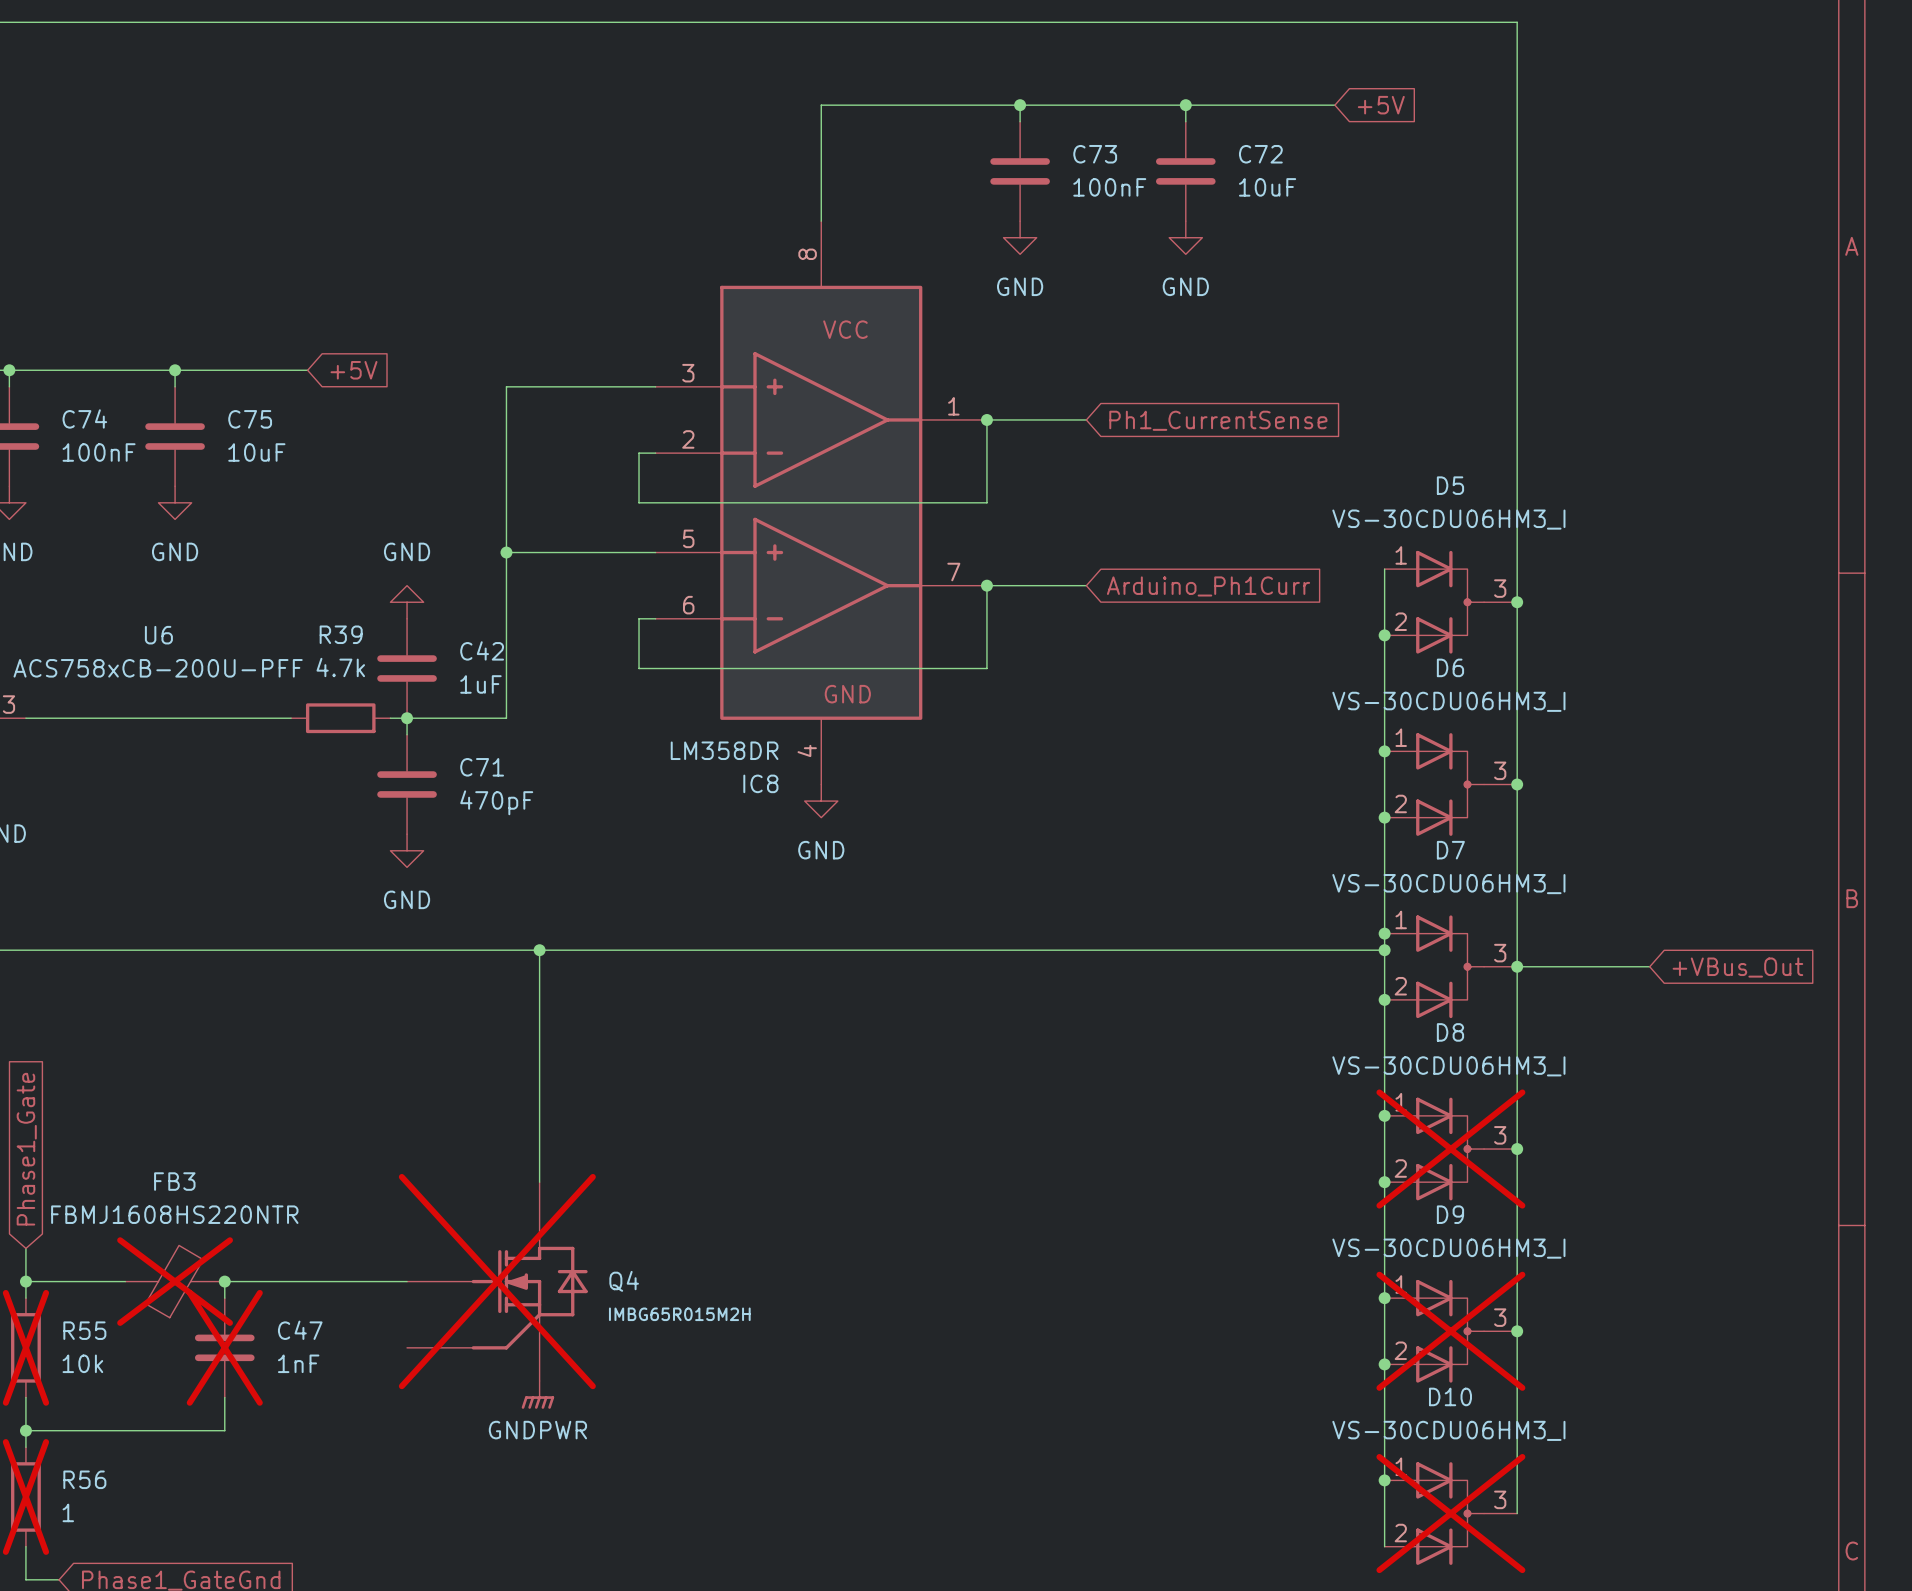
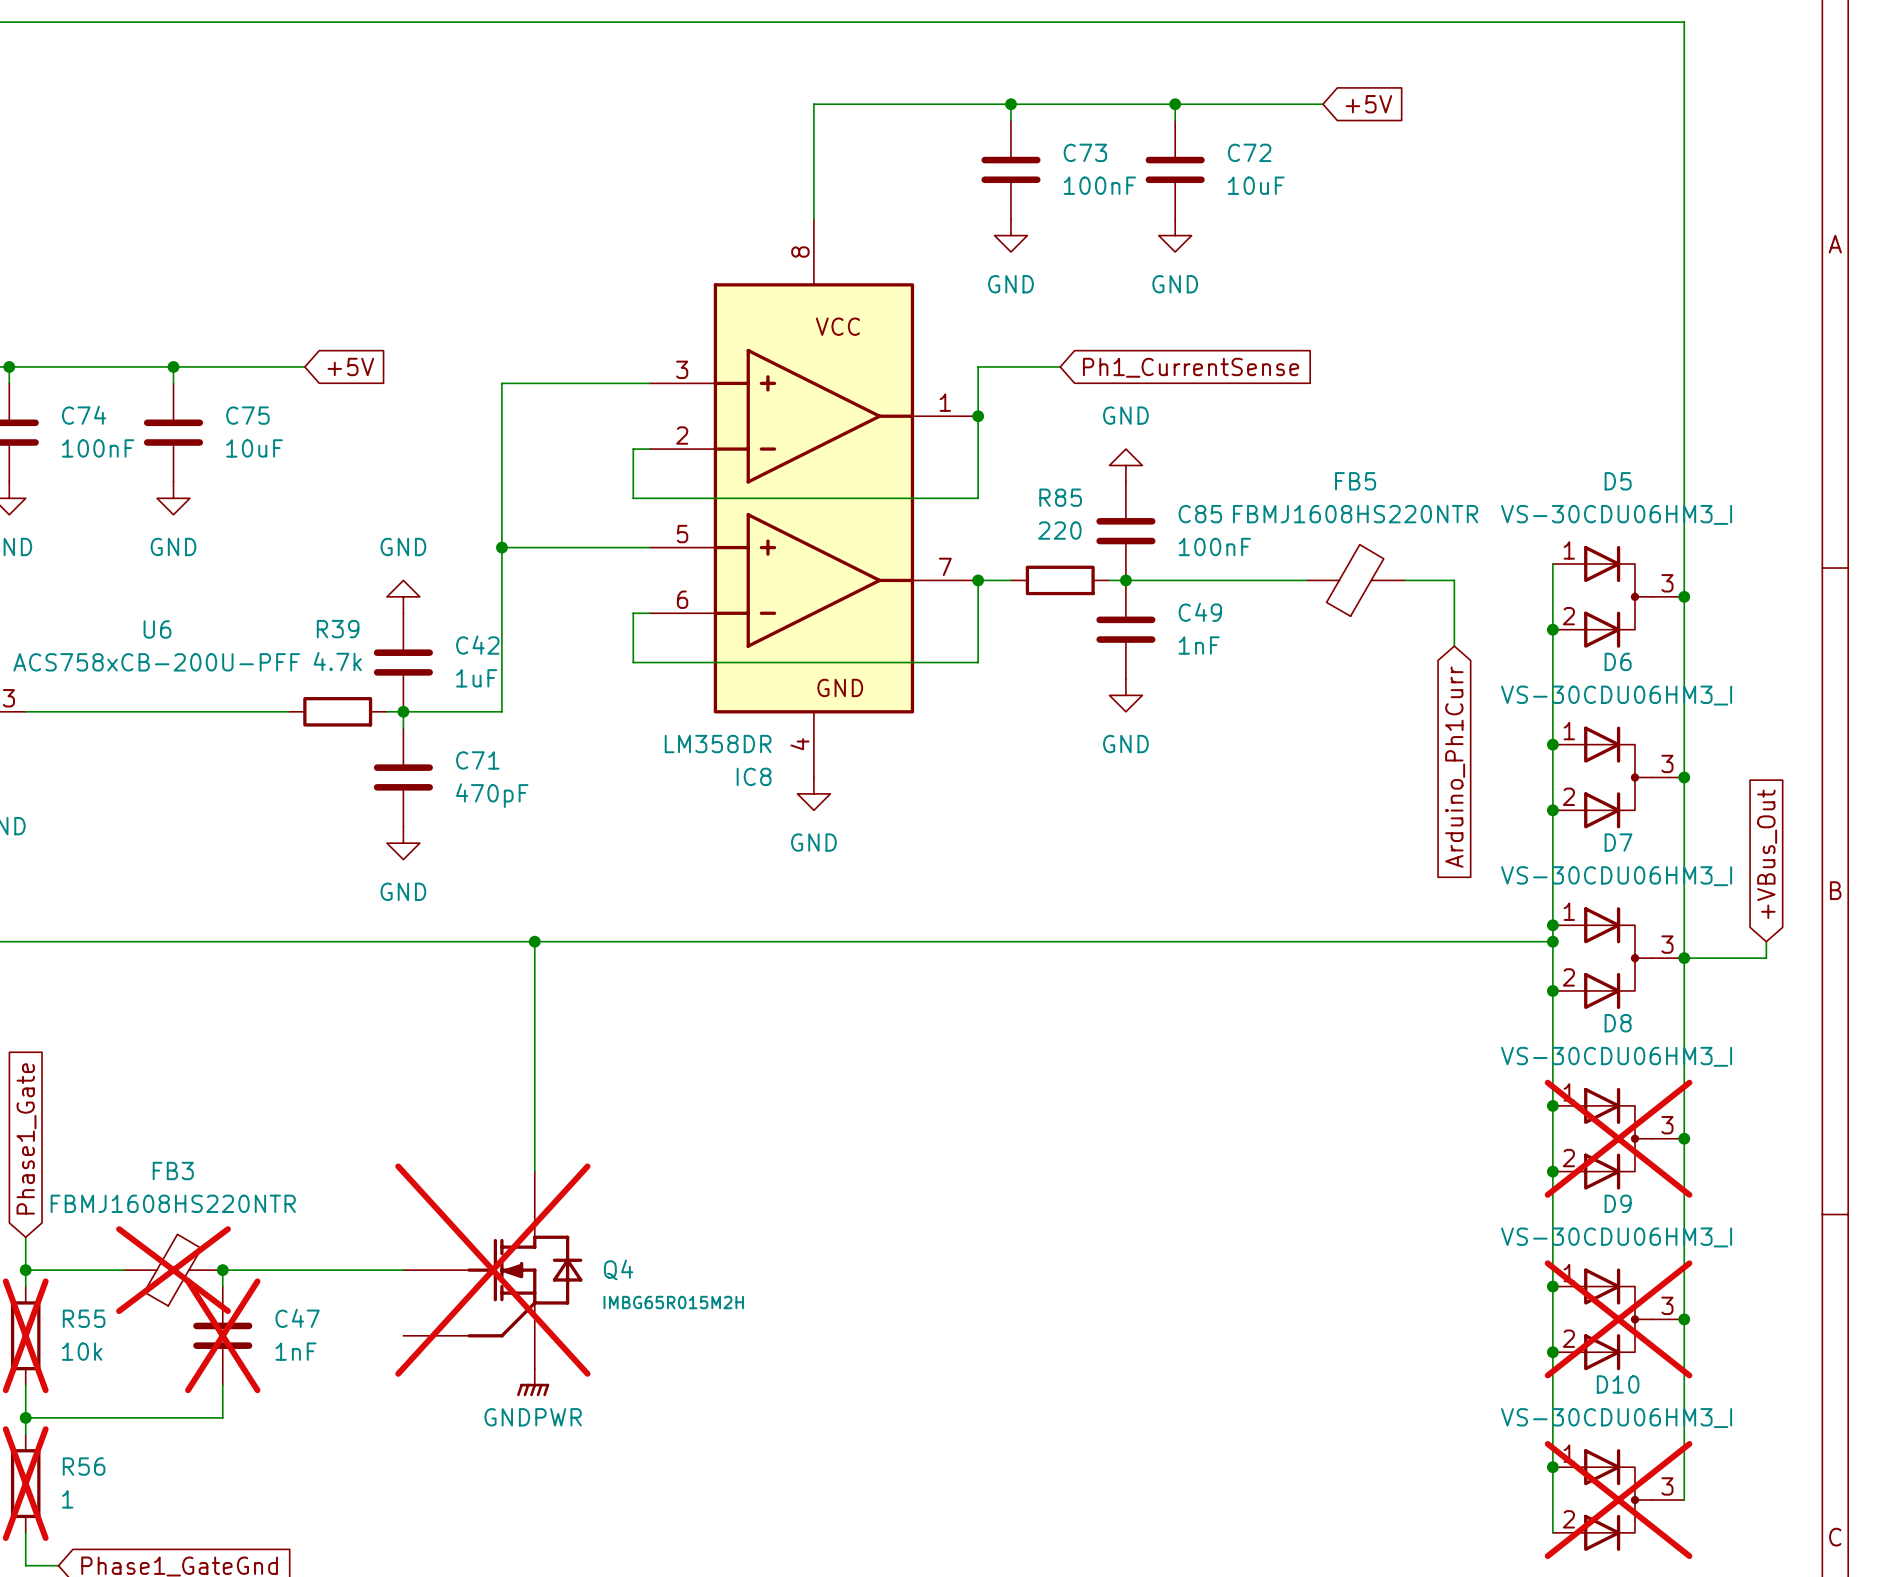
wire: (1517, 22) (1517, 1513) -> (1503, 22) (1684, 22) (1684, 1500)
wire: (986, 419) (1086, 419) -> (978, 416) (978, 366) (1060, 366)
global label position: Ph1_CurrentSense (1218, 420) -> Ph1_CurrentSense (1191, 367)
power symbol: none -> GND (1125, 465)
C85: none -> 100nF (1125, 531)
wire: (1384, 569) (1384, 1546) -> (1552, 564) (1552, 1532)
wire: (1020, 585) (1086, 585) -> none
R85: none -> 220 (1060, 580)
wire: none -> (1109, 580) (1306, 580)
junction: none -> (1125, 580)
FB5: none -> FBMJ1608HS220NTR (1355, 580)
wire: none -> (1405, 580) (1454, 580) (1454, 646)
global label: Arduino_Ph1Curr (1208, 586) -> none
D5 position: (1450, 602) -> (1618, 596)
junction position: (1517, 602) -> (1552, 629)
junction: none -> (1684, 596)
C49: none -> 1nF (1125, 629)
junction: (1384, 635) -> none
power symbol: none -> GND (1125, 695)
junction: (1384, 751) -> none
junction: none -> (1552, 744)
global label: none -> Arduino_Ph1Curr (1455, 767)
D6 position: (1450, 784) -> (1618, 777)
junction: (1517, 784) -> none
junction: none -> (1684, 777)
junction: (1384, 817) -> none
junction: none -> (1552, 810)
junction: (1384, 933) -> none
junction: none -> (1552, 925)
wire: none -> (1372, 941) (1552, 941)
junction: (1384, 950) -> none
junction: none -> (1552, 941)
wire: none -> (1766, 941) (1766, 958) (1684, 958)
D7 position: (1450, 966) -> (1618, 958)
wire: (1517, 966) (1649, 966) -> none
junction: (1517, 966) -> none
junction: none -> (1684, 958)
global label rotation: 0° (1737, 967) -> 90° counterclockwise (1767, 854)
junction: (1384, 999) -> none
junction: none -> (1552, 990)
junction: (1384, 1115) -> none
junction: none -> (1552, 1105)
D8 position: (1450, 1149) -> (1618, 1138)
junction: (1517, 1149) -> none
junction: none -> (1684, 1138)
junction: (1384, 1182) -> none
junction: none -> (1552, 1171)
junction: (1384, 1298) -> none
junction: none -> (1552, 1286)
D9 position: (1450, 1331) -> (1618, 1319)
junction: (1517, 1331) -> none
junction: none -> (1684, 1319)
junction: (1384, 1364) -> none
junction: none -> (1552, 1352)
junction: (1384, 1480) -> none
junction: none -> (1552, 1467)
D10 position: (1450, 1513) -> (1618, 1500)

